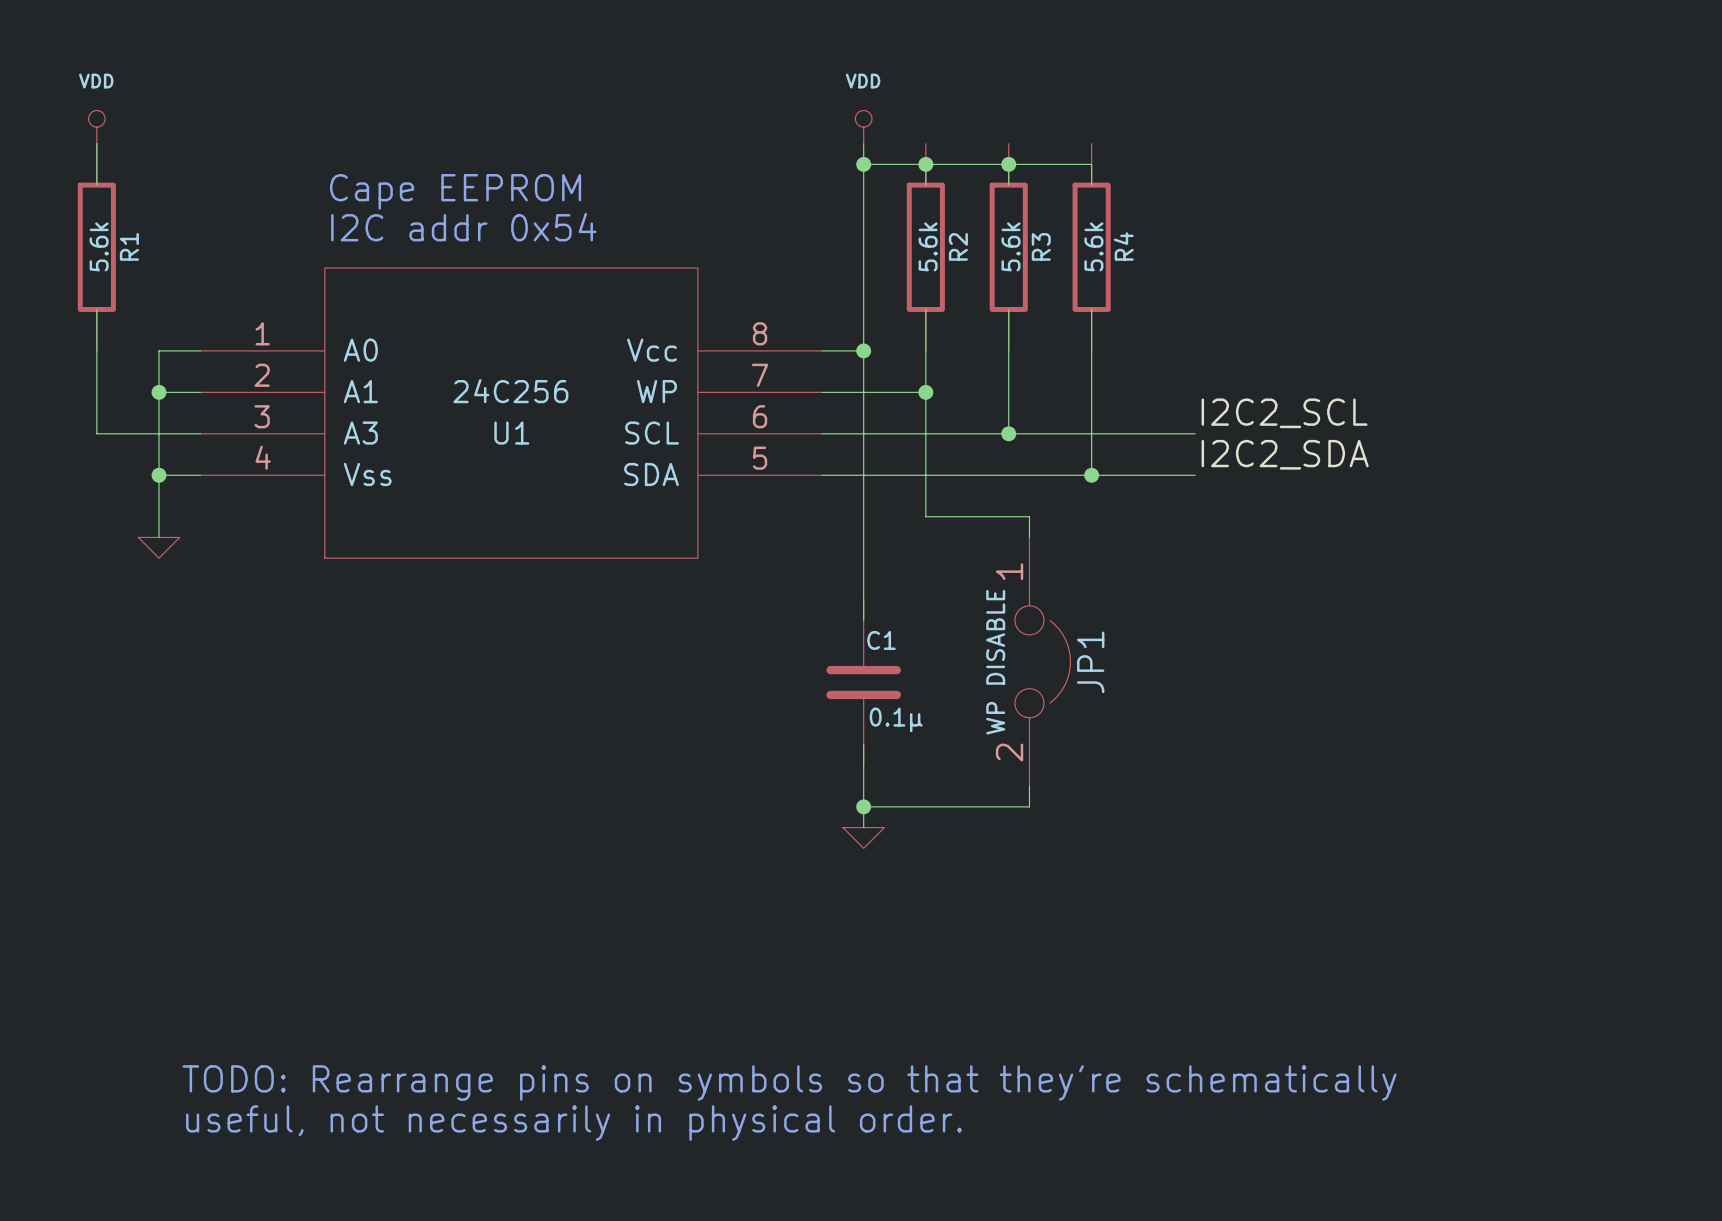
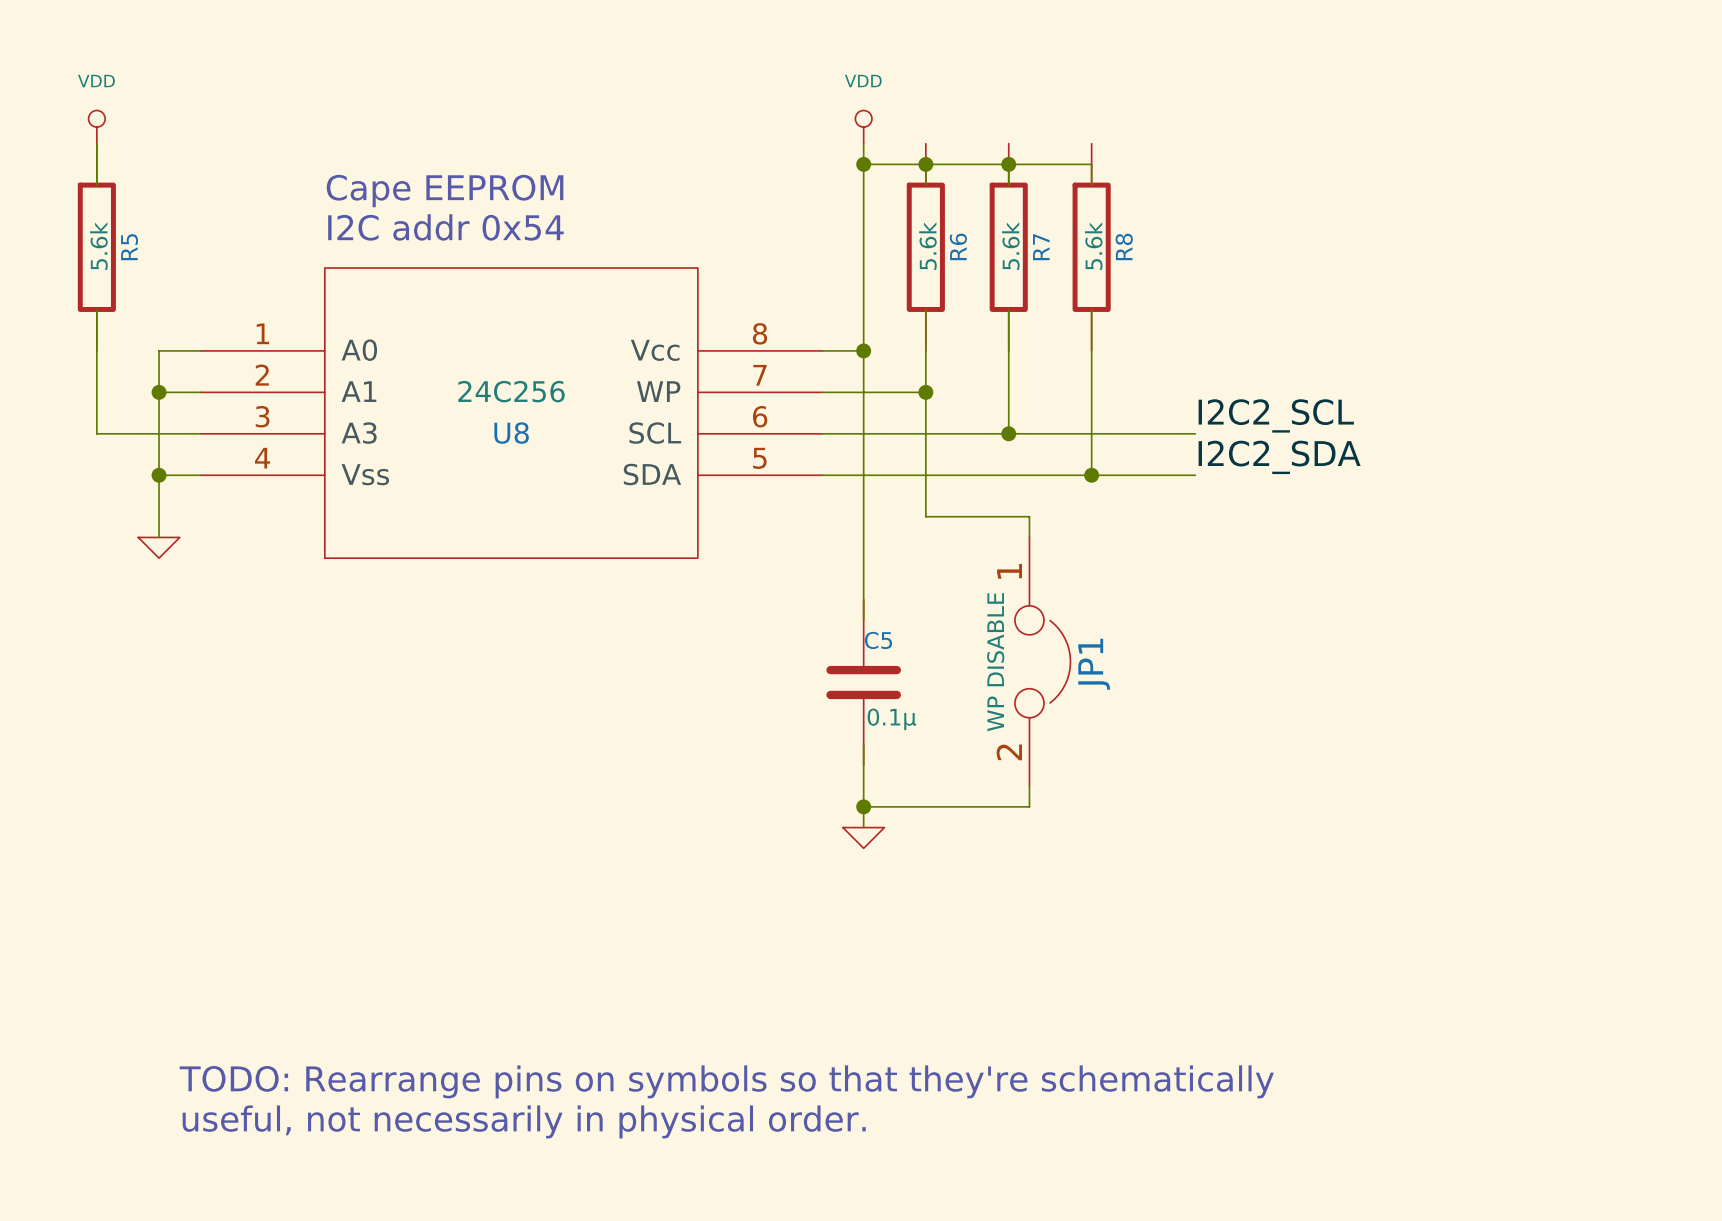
R1 name: R1 (129, 246) -> R5 (129, 247)
R2 name: R2 (958, 246) -> R6 (958, 246)
R3 name: R3 (1041, 246) -> R7 (1041, 247)
R4 name: R4 (1123, 246) -> R8 (1124, 246)
U1 name: U1 (511, 433) -> U8 (511, 433)
C1 name: C1 (881, 640) -> C5 (878, 640)

